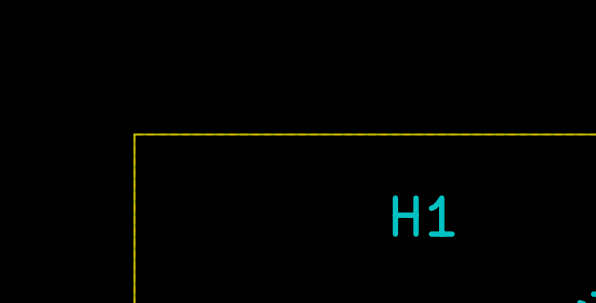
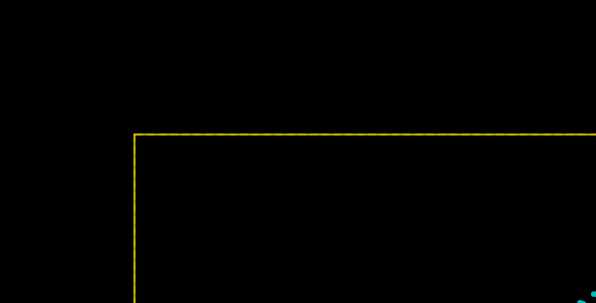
H1 name: H1 (423, 216) -> none

